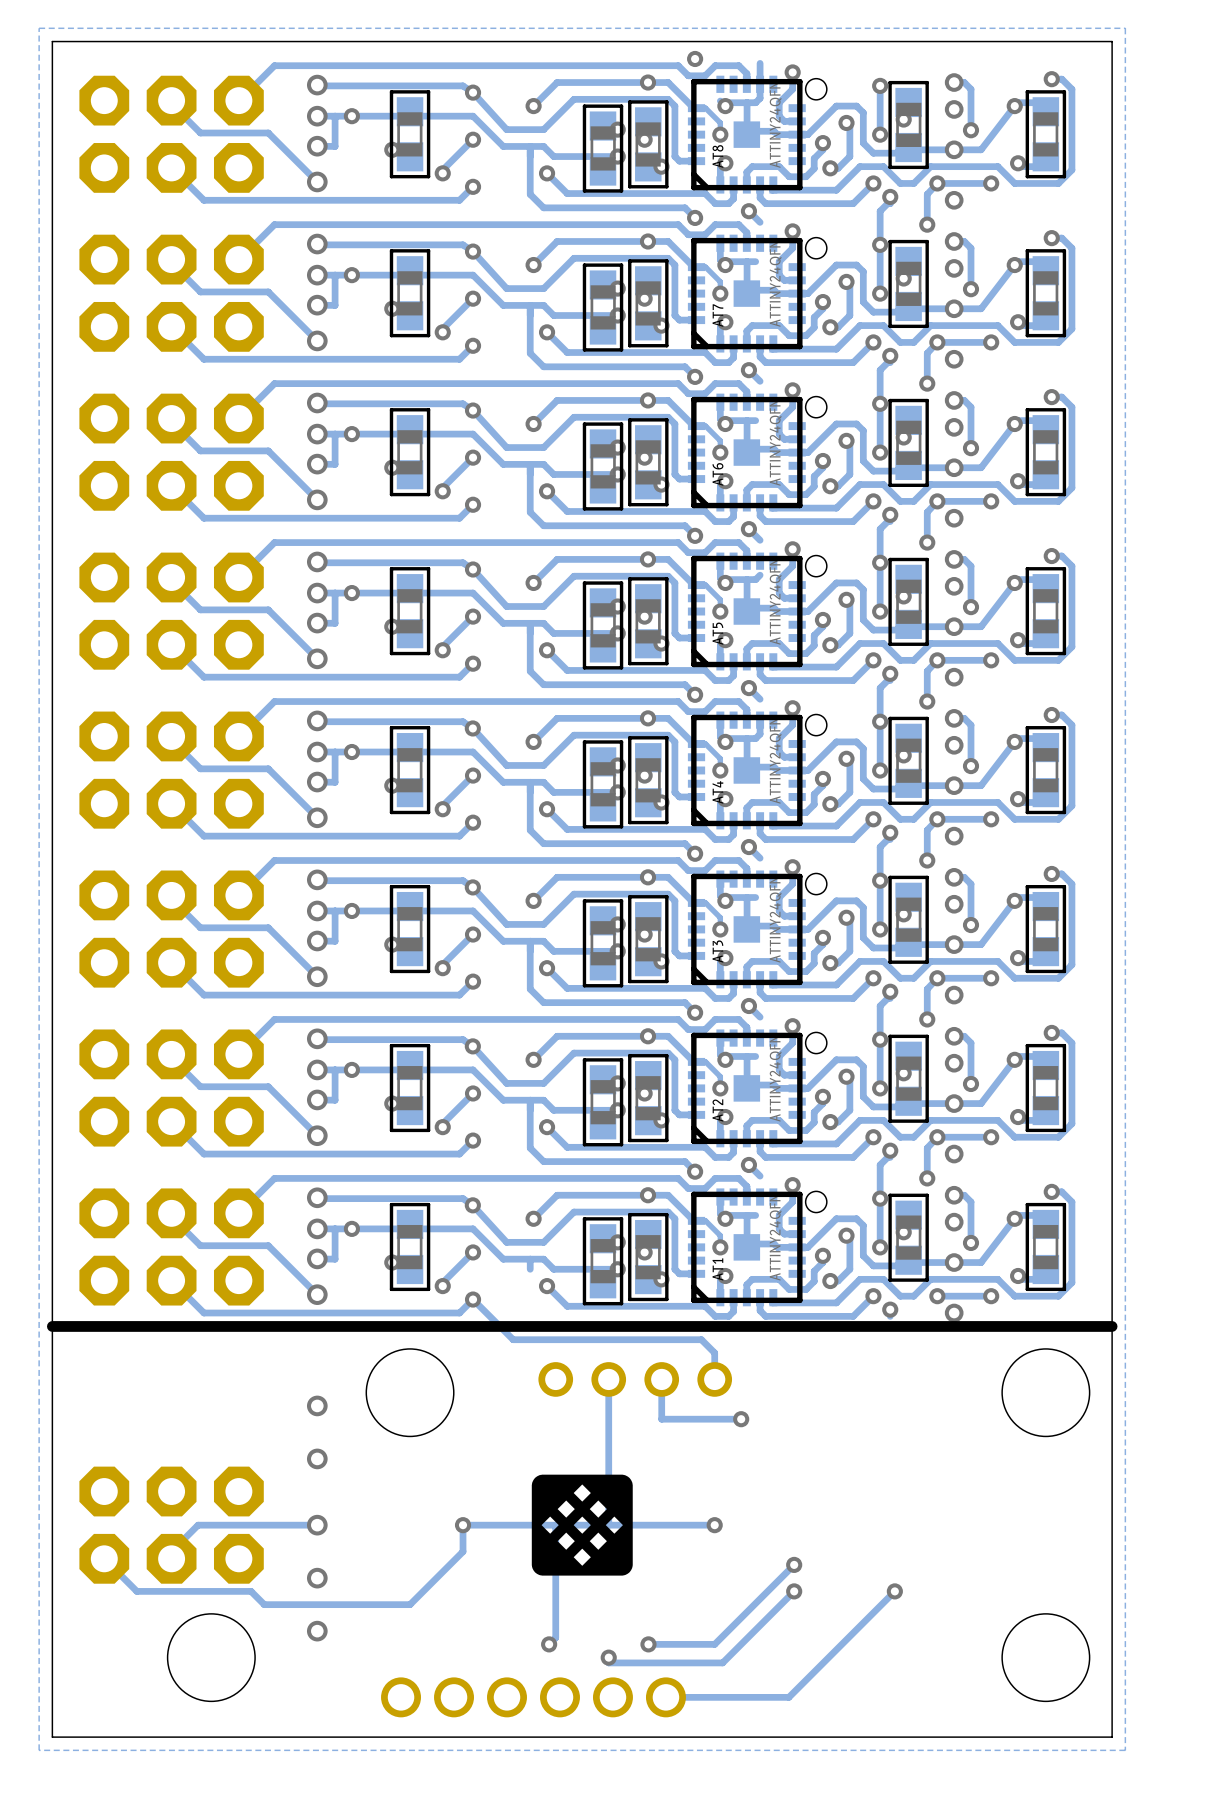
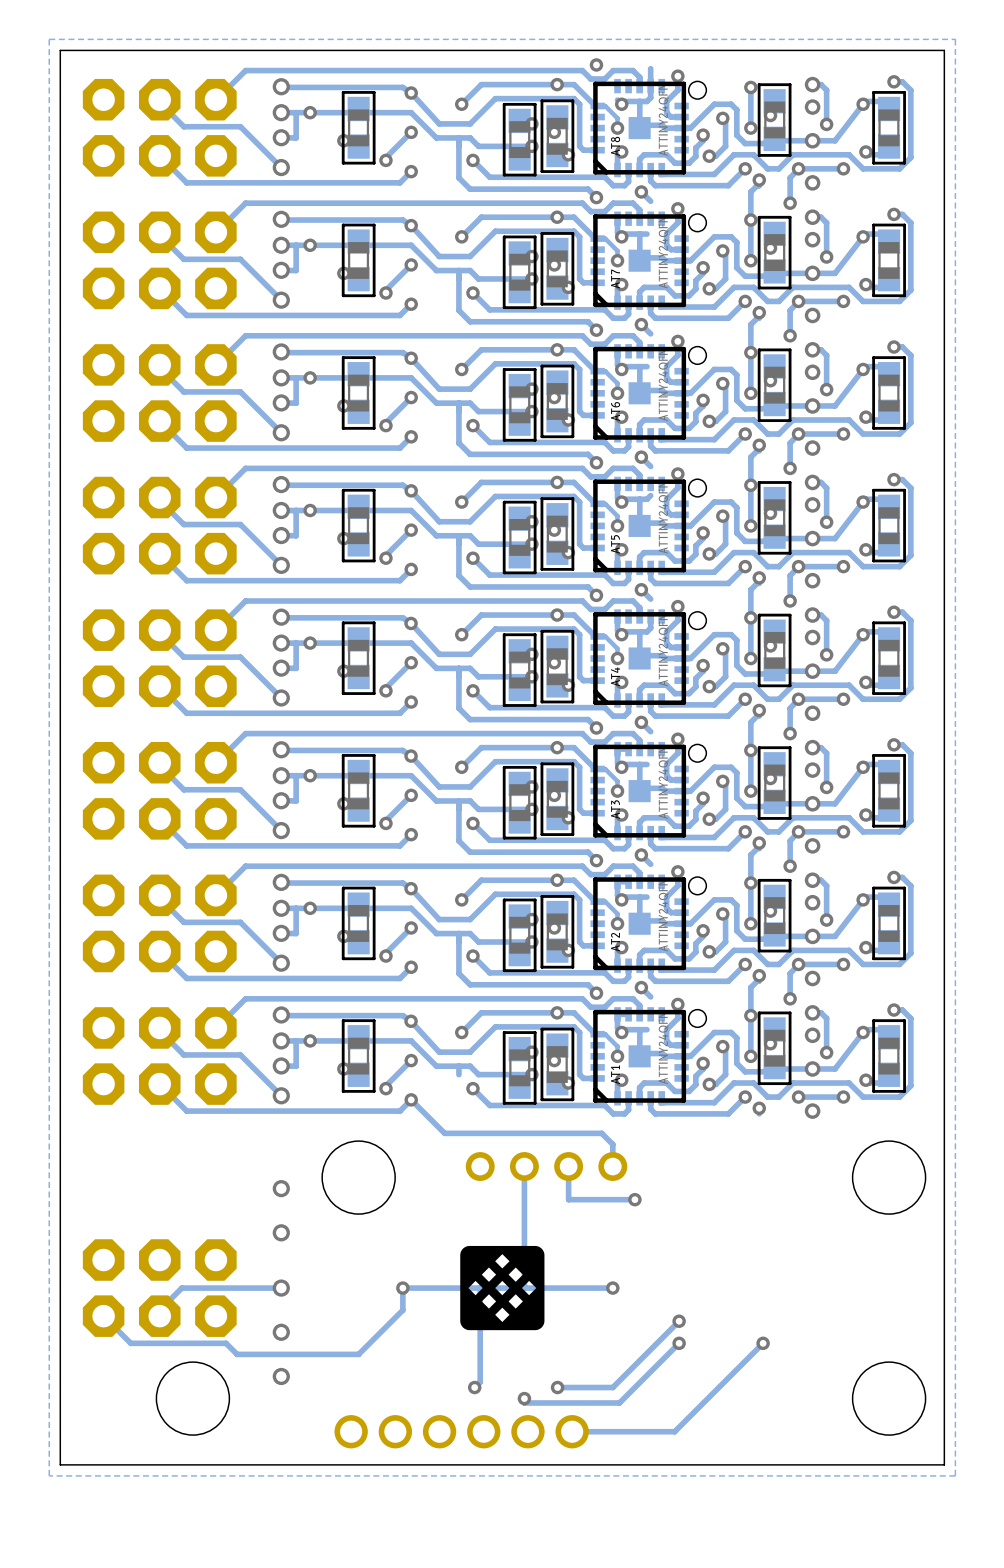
line: (1112, 1326) (52, 1326) -> none

